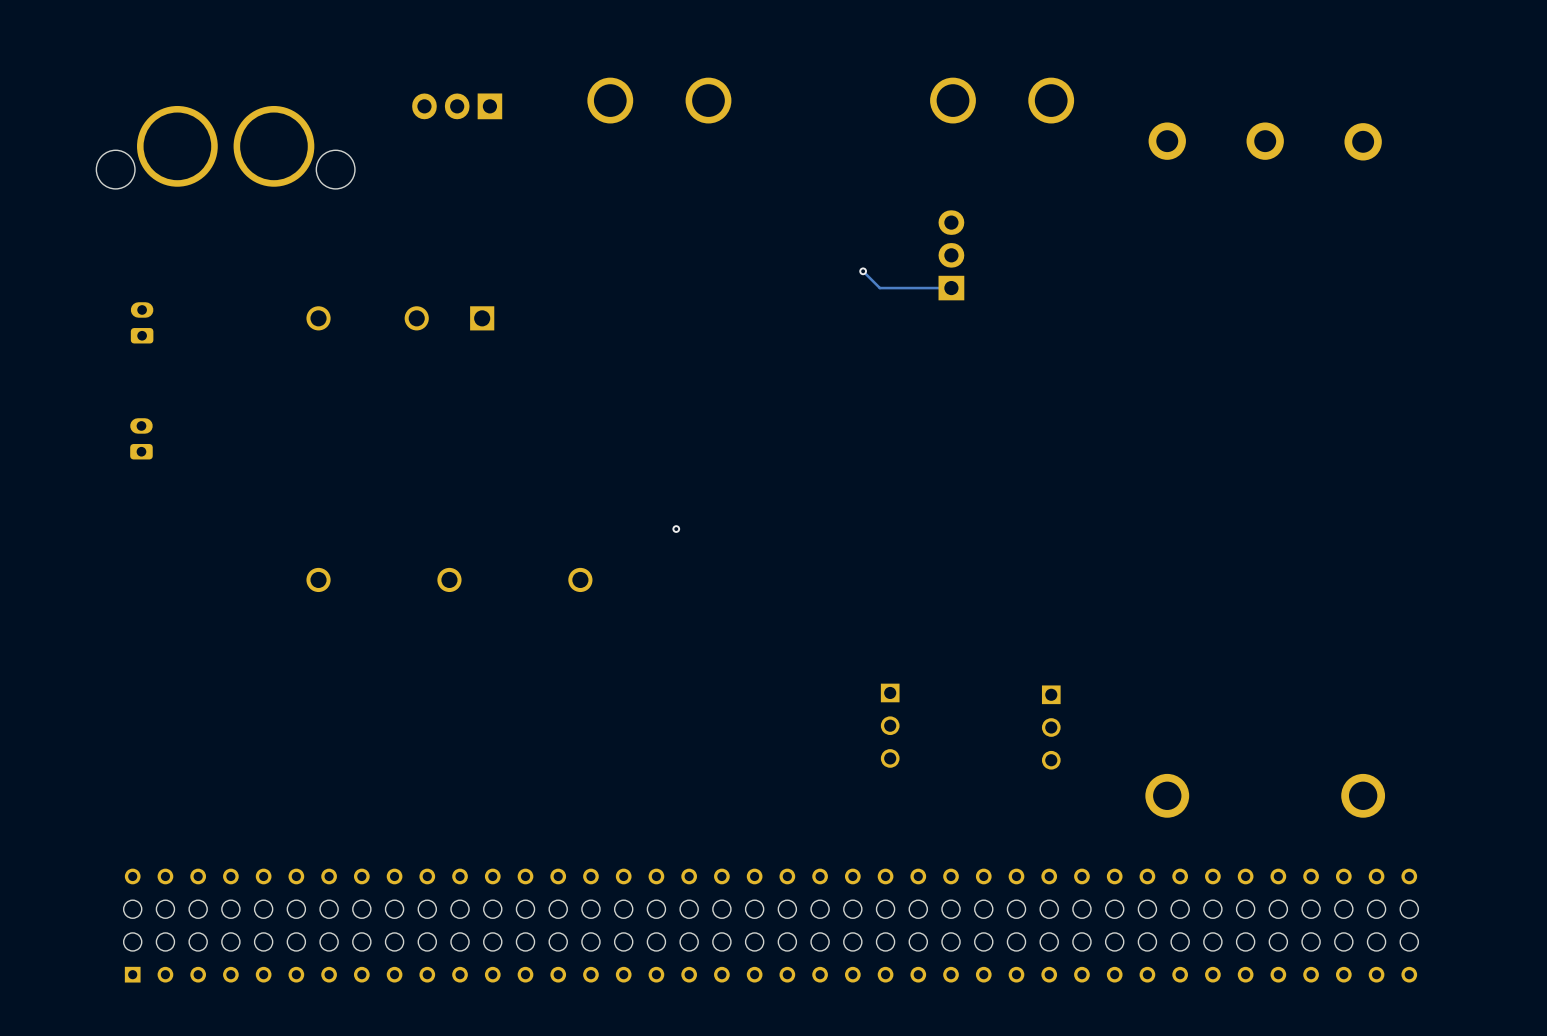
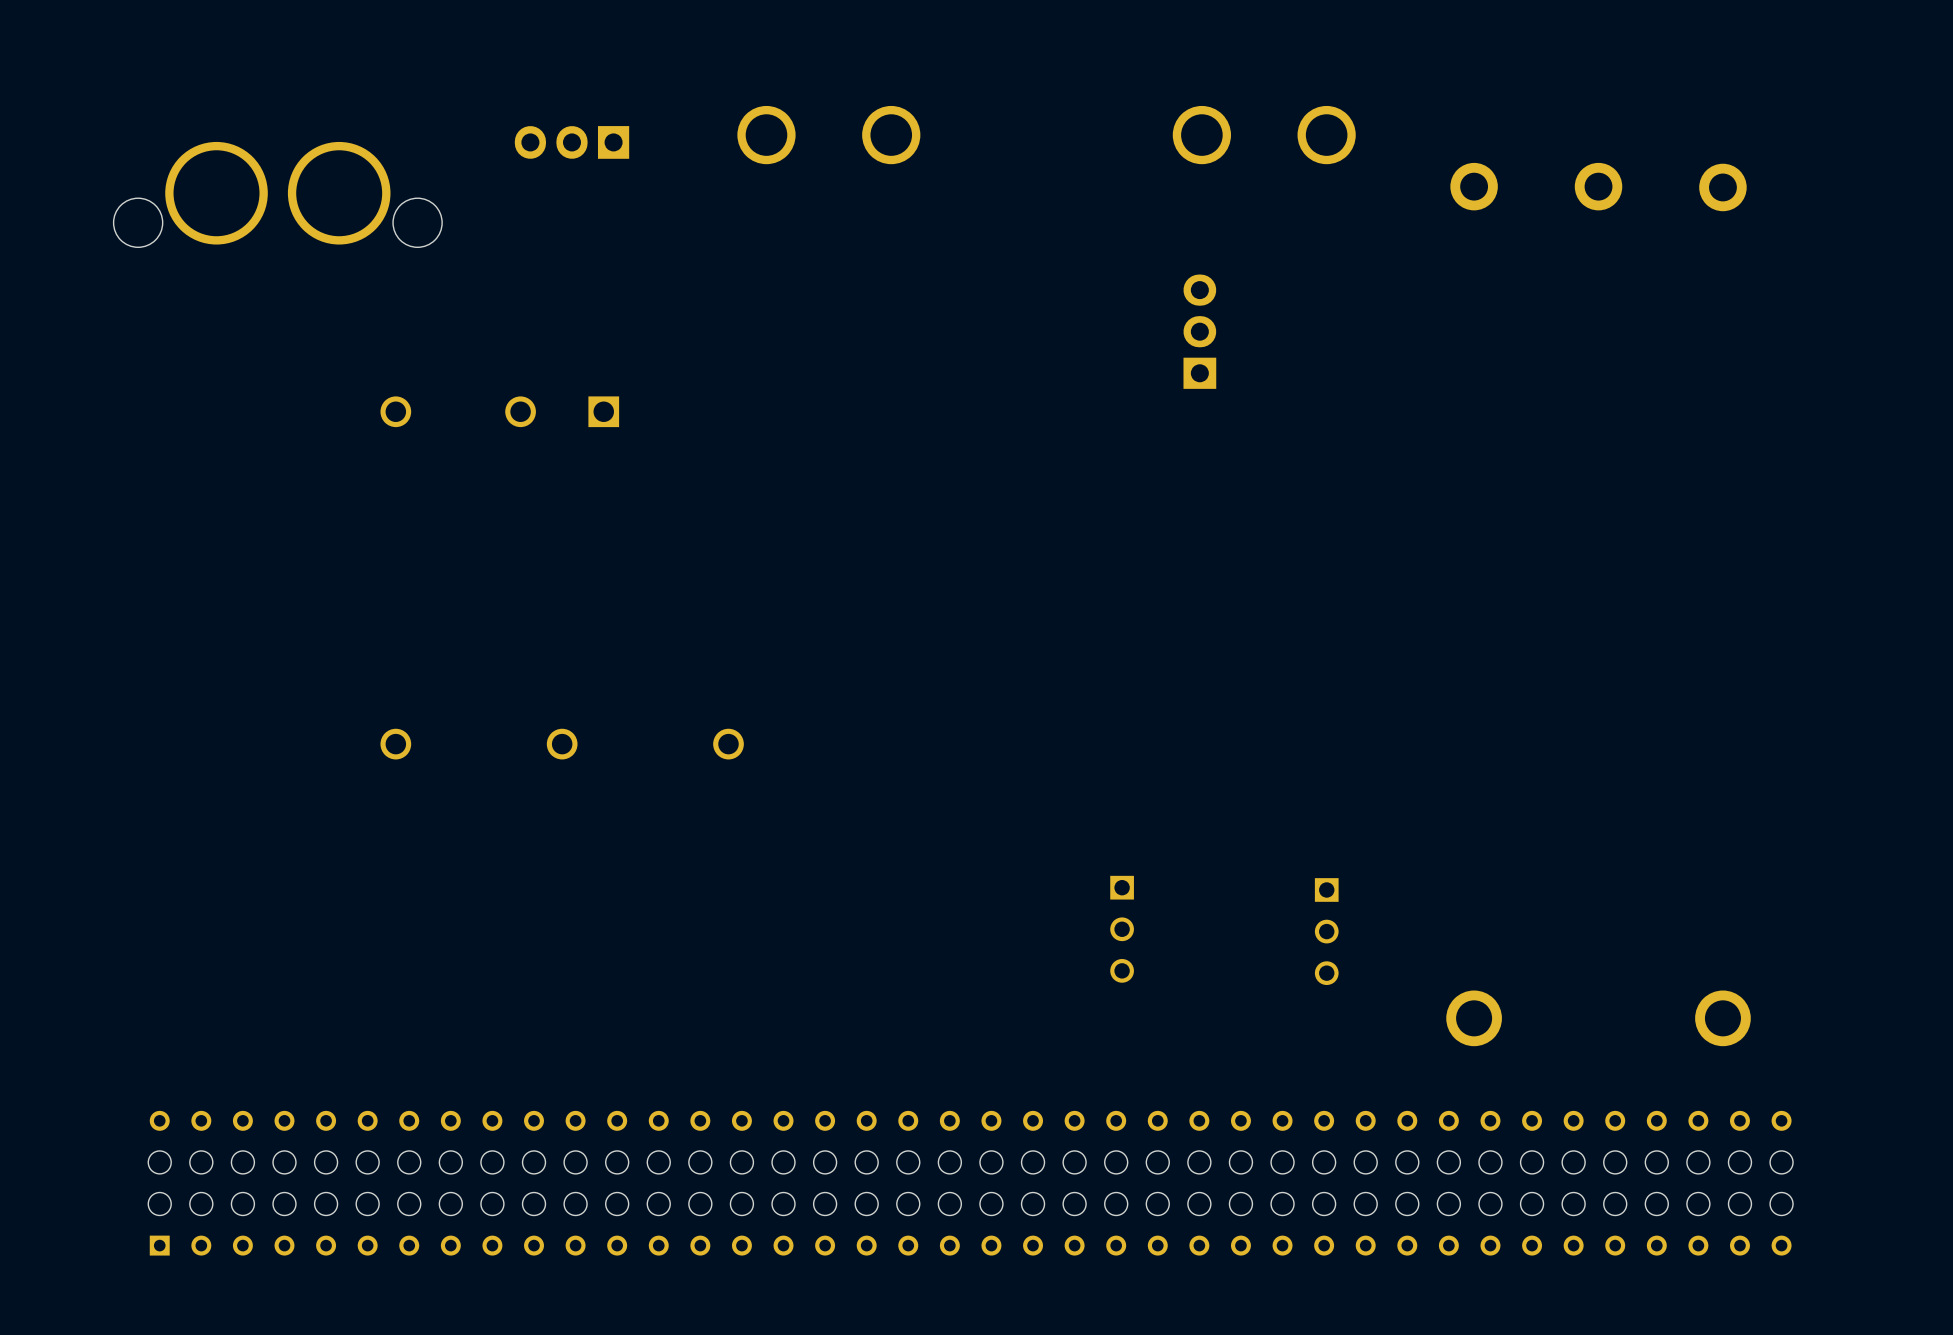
track: (863, 271) (879, 288) (951, 288) -> none
via: (863, 271) -> none
part: (142, 322) -> none
part: (141, 438) -> none
via: (676, 529) -> none

